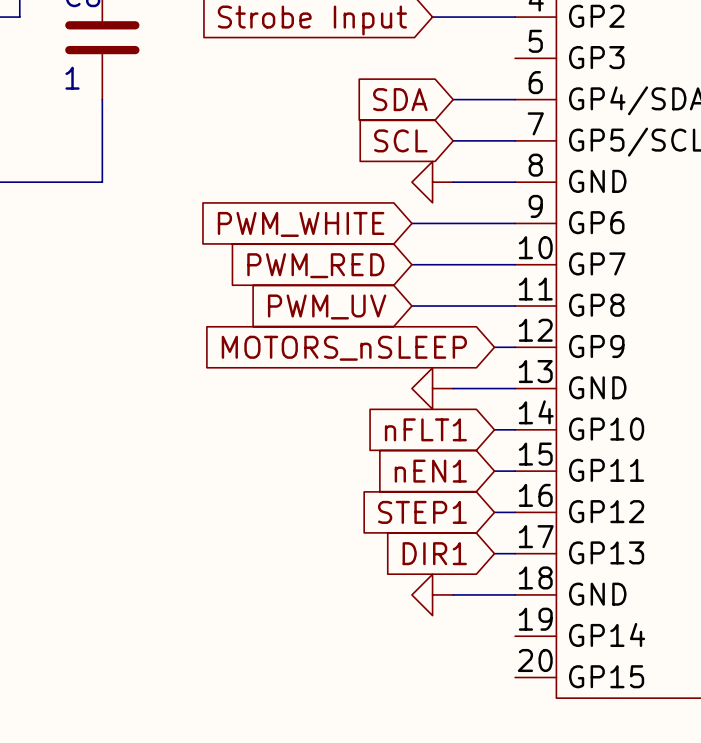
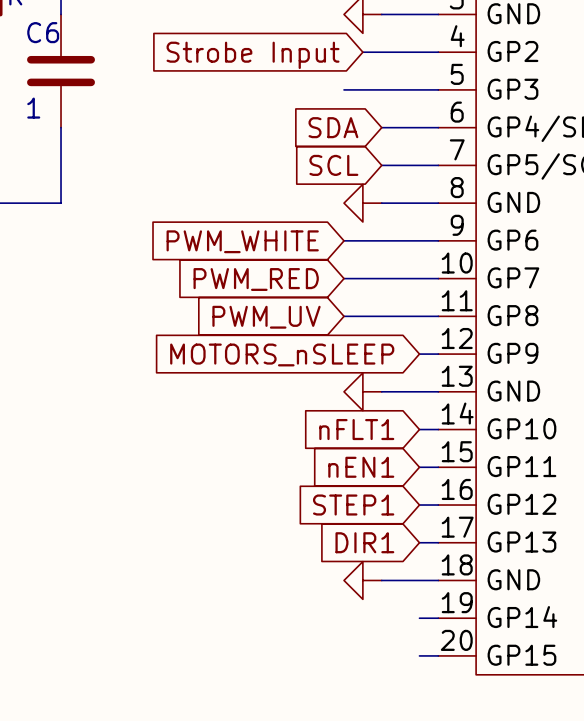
wire: none -> (344, 89) (438, 89)
wire: none -> (419, 618) (438, 618)
wire: none -> (419, 655) (438, 655)

